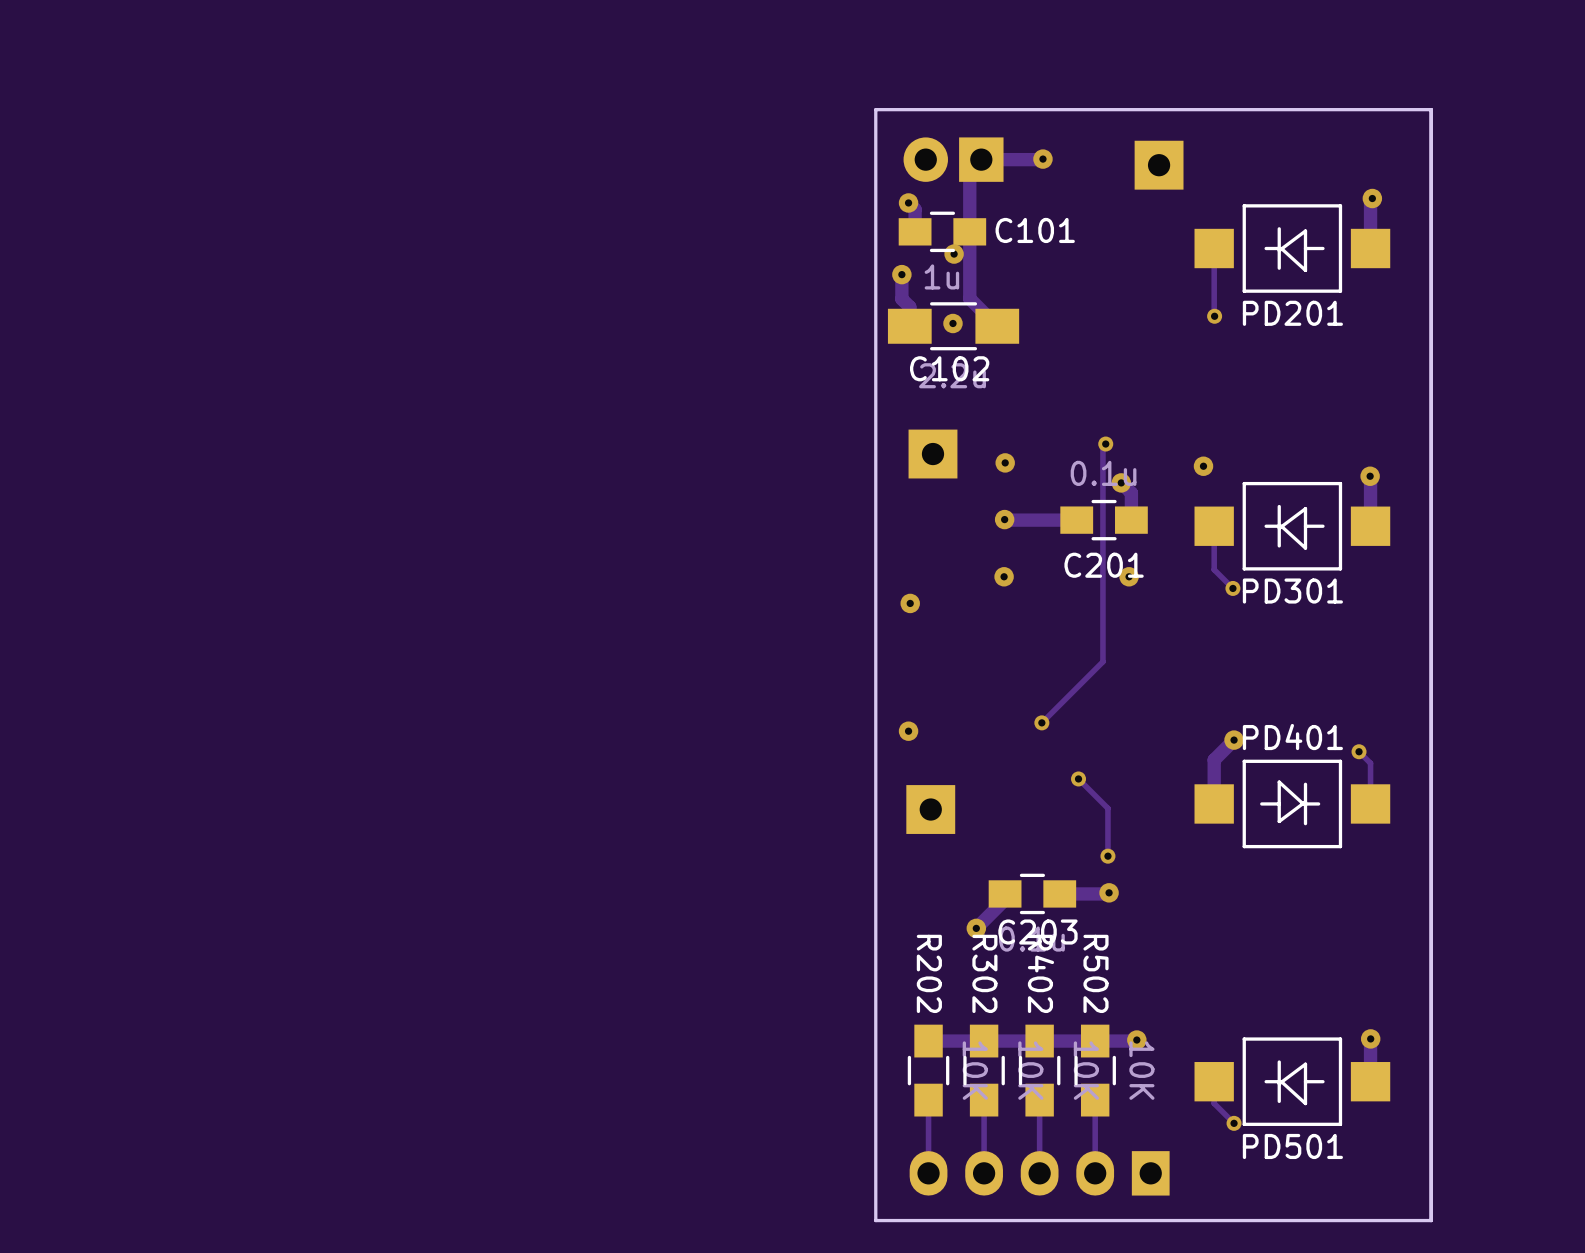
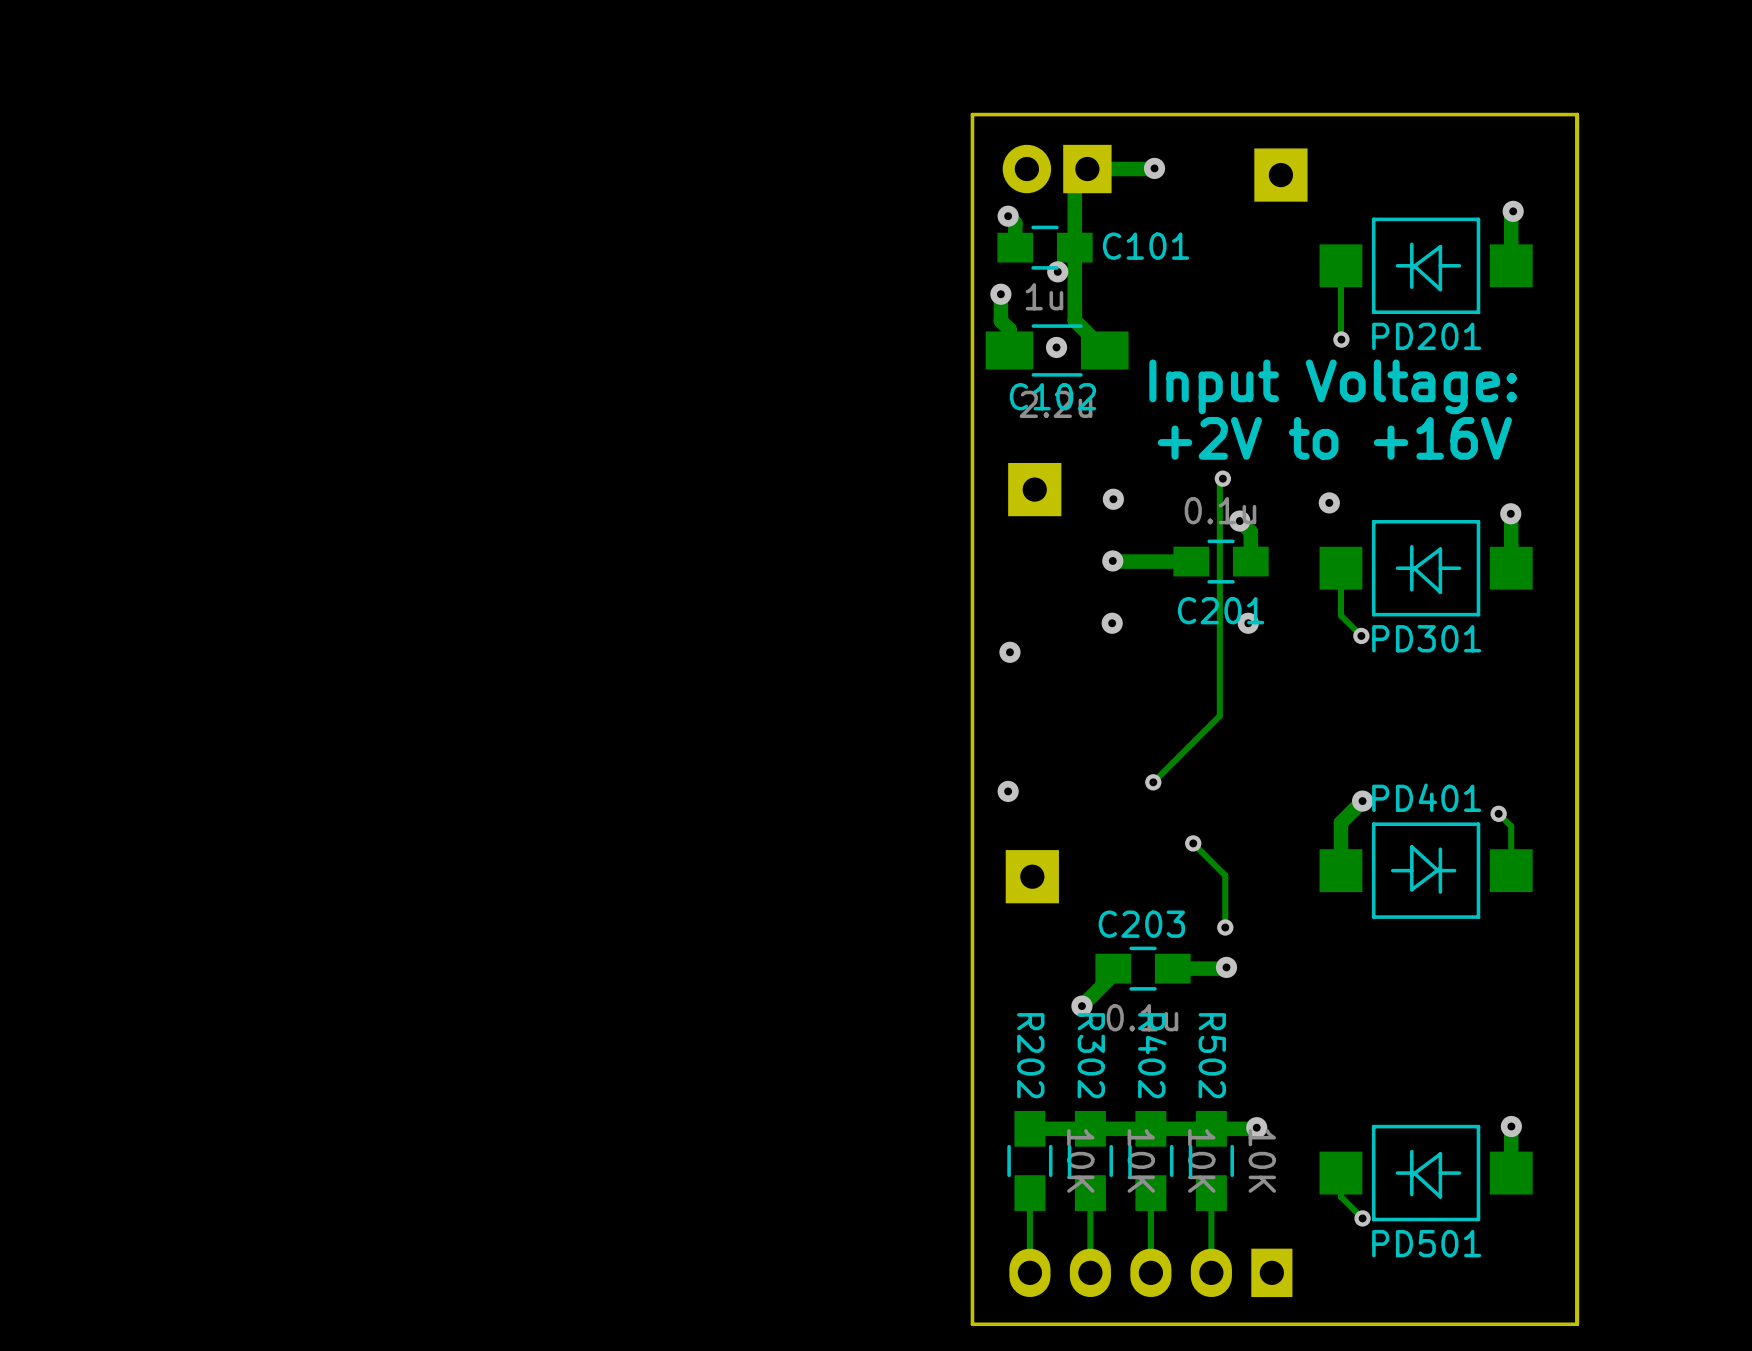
text: none -> Input Voltage: (1333, 386)
text: none -> +2V to +16V (1334, 438)
C203 name position: C203 (1037, 932) -> C203 (1141, 924)

